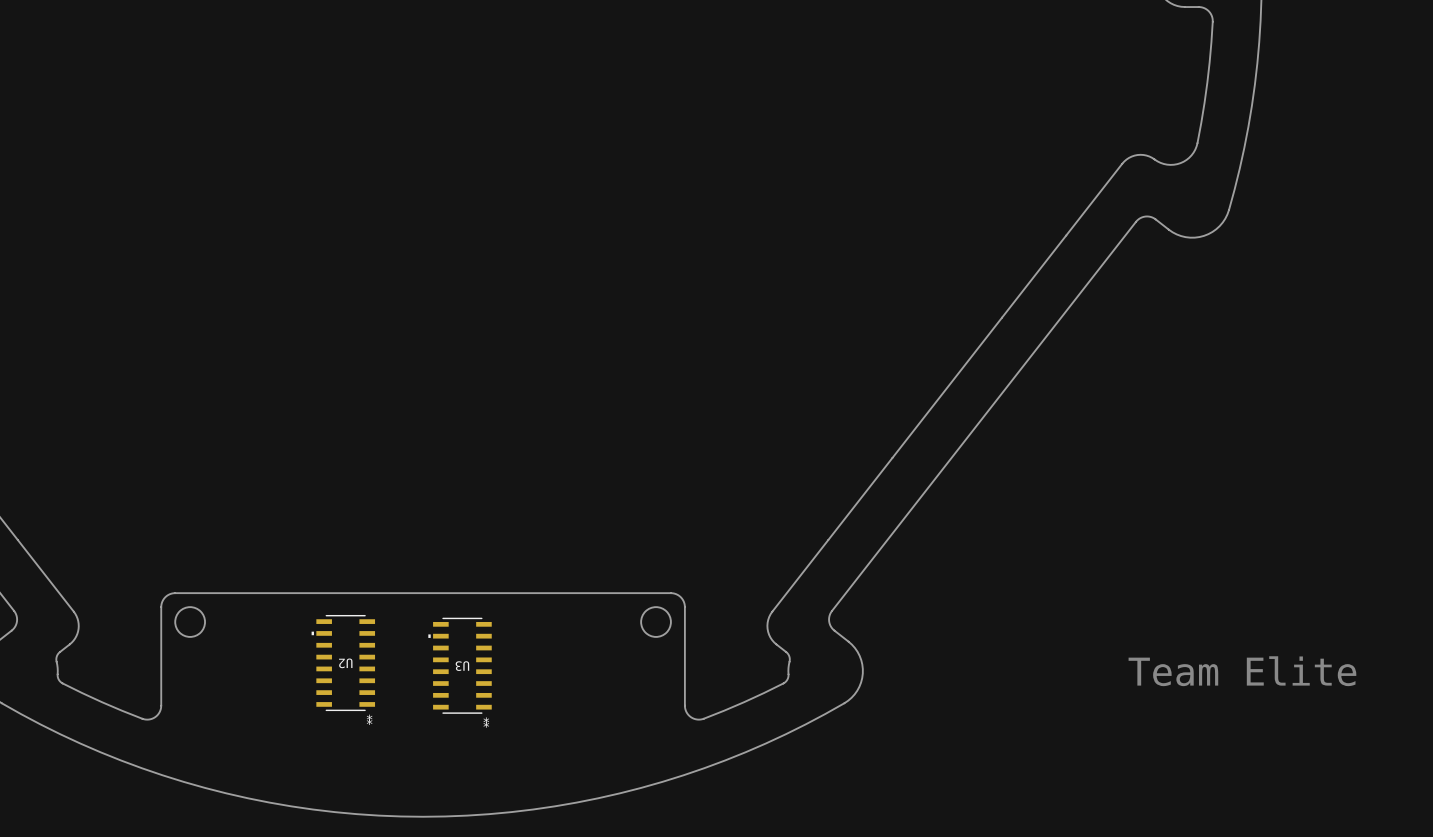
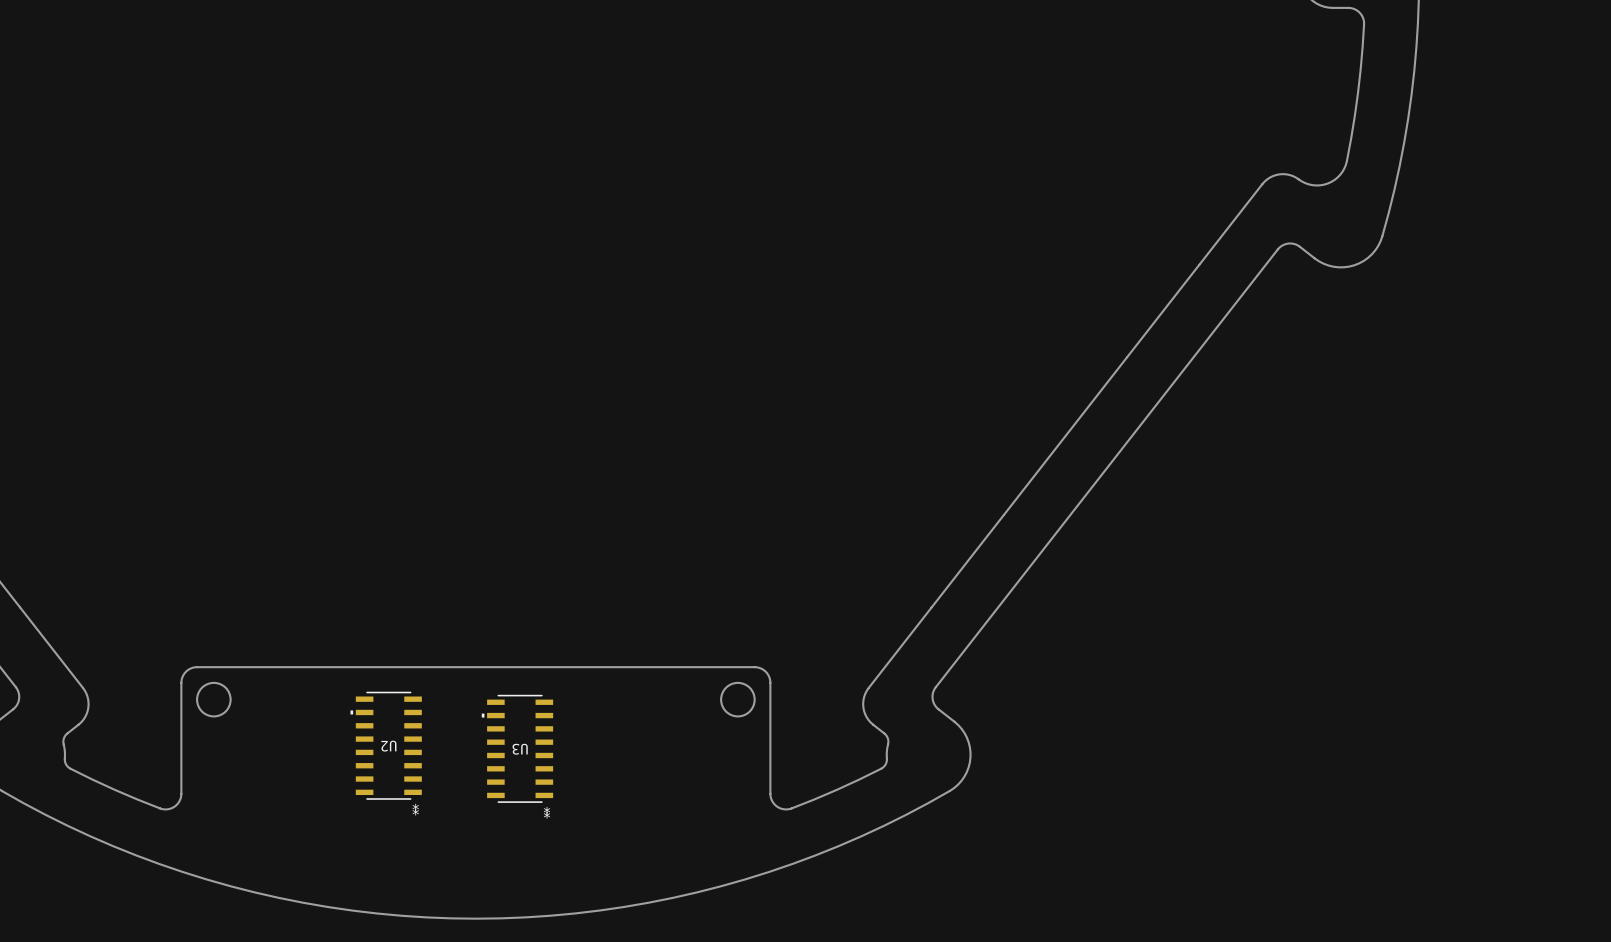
text: Team Elite (1242, 671) -> none

